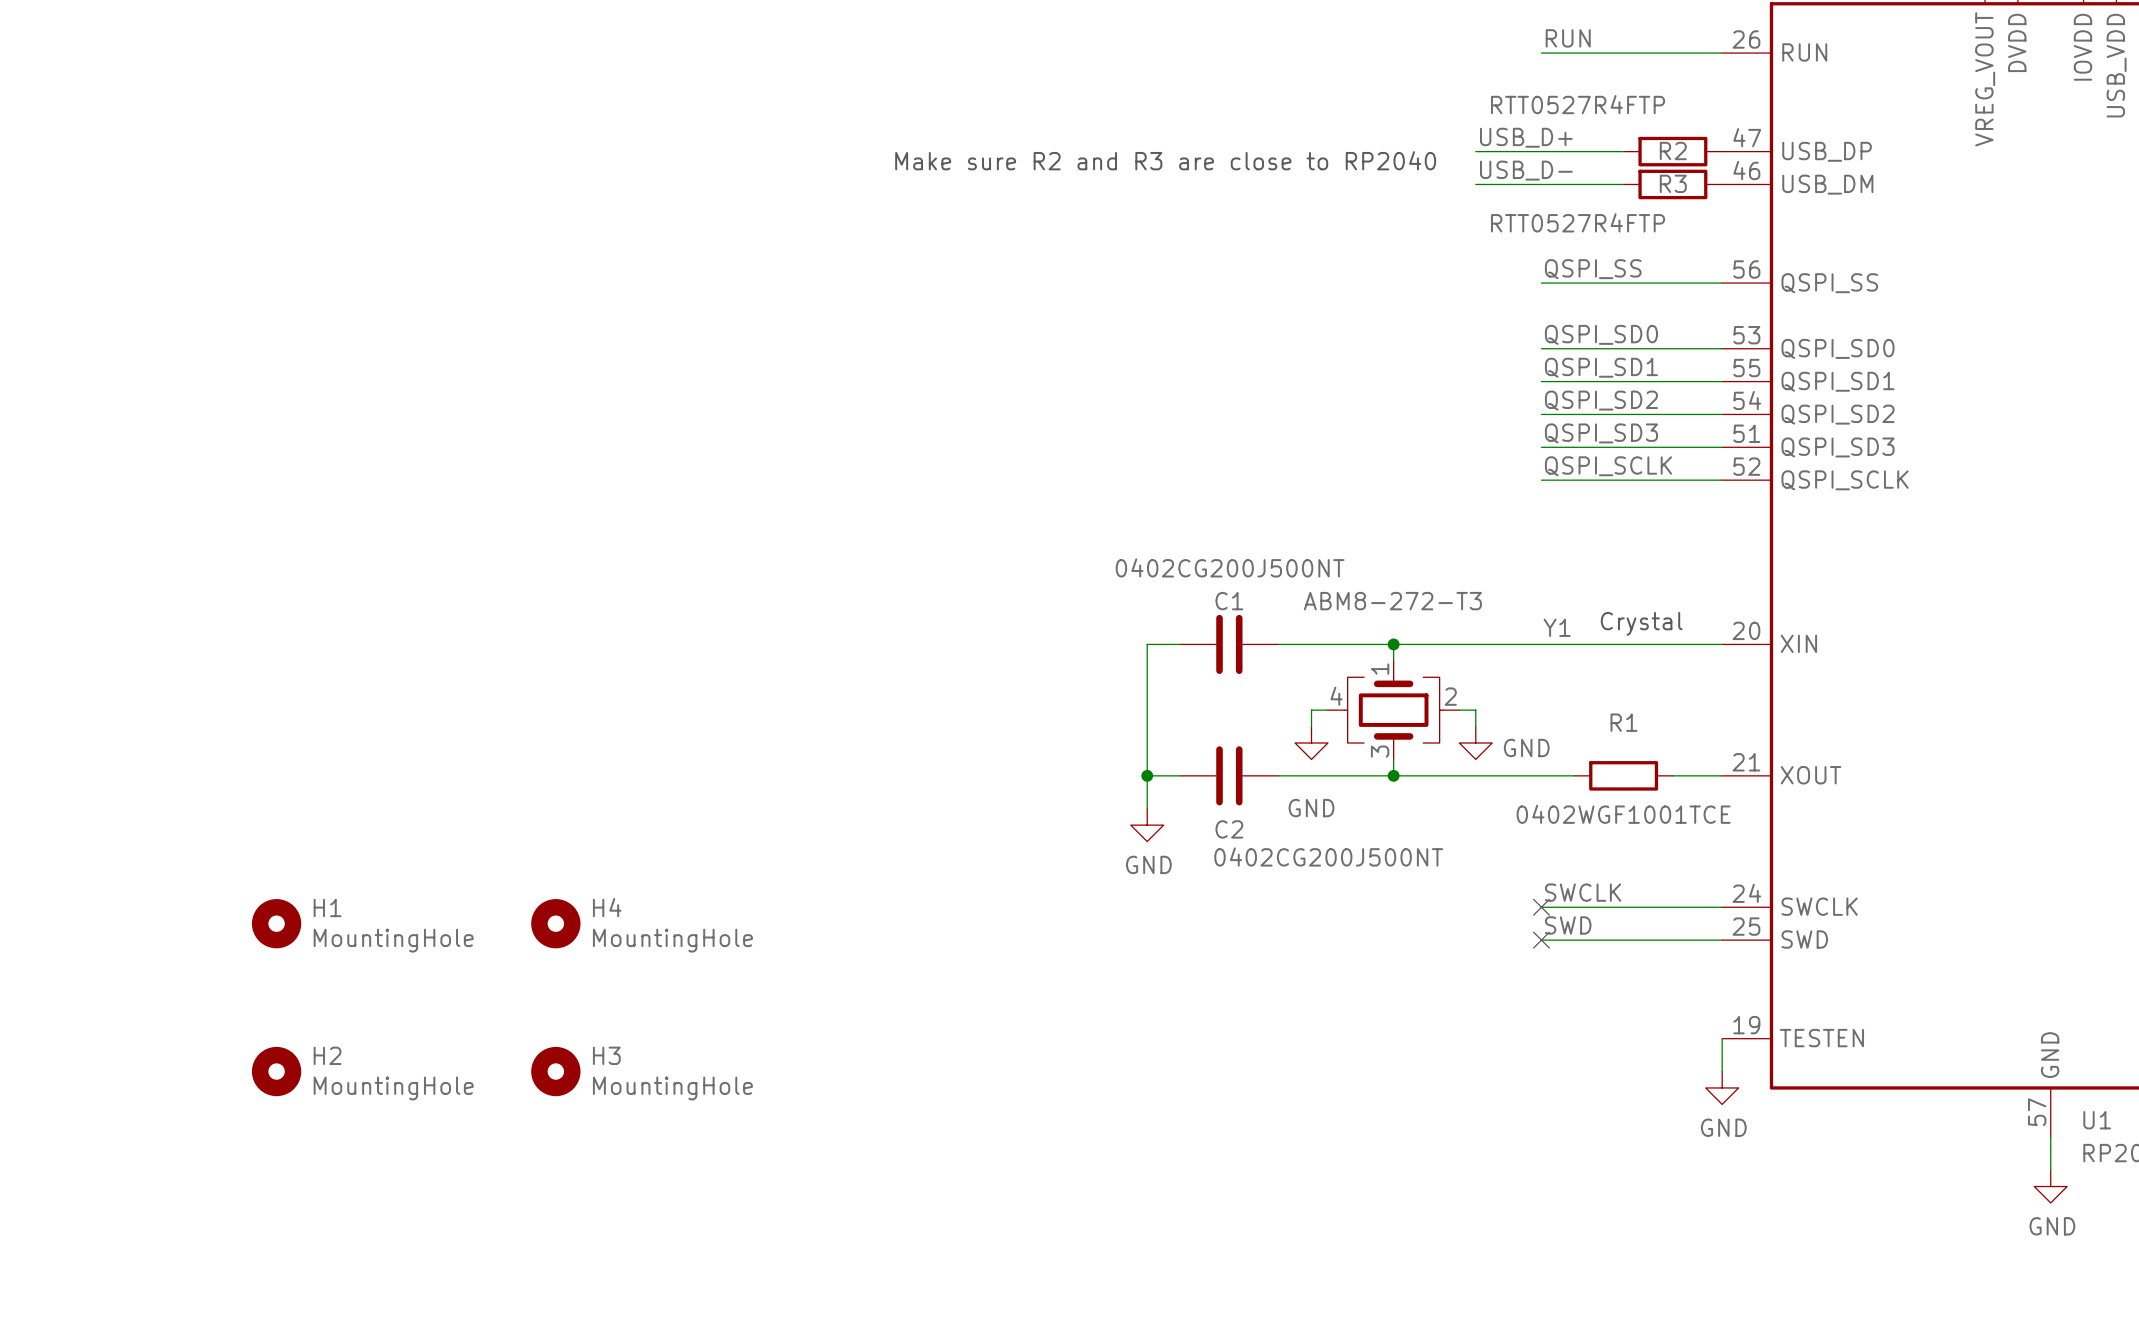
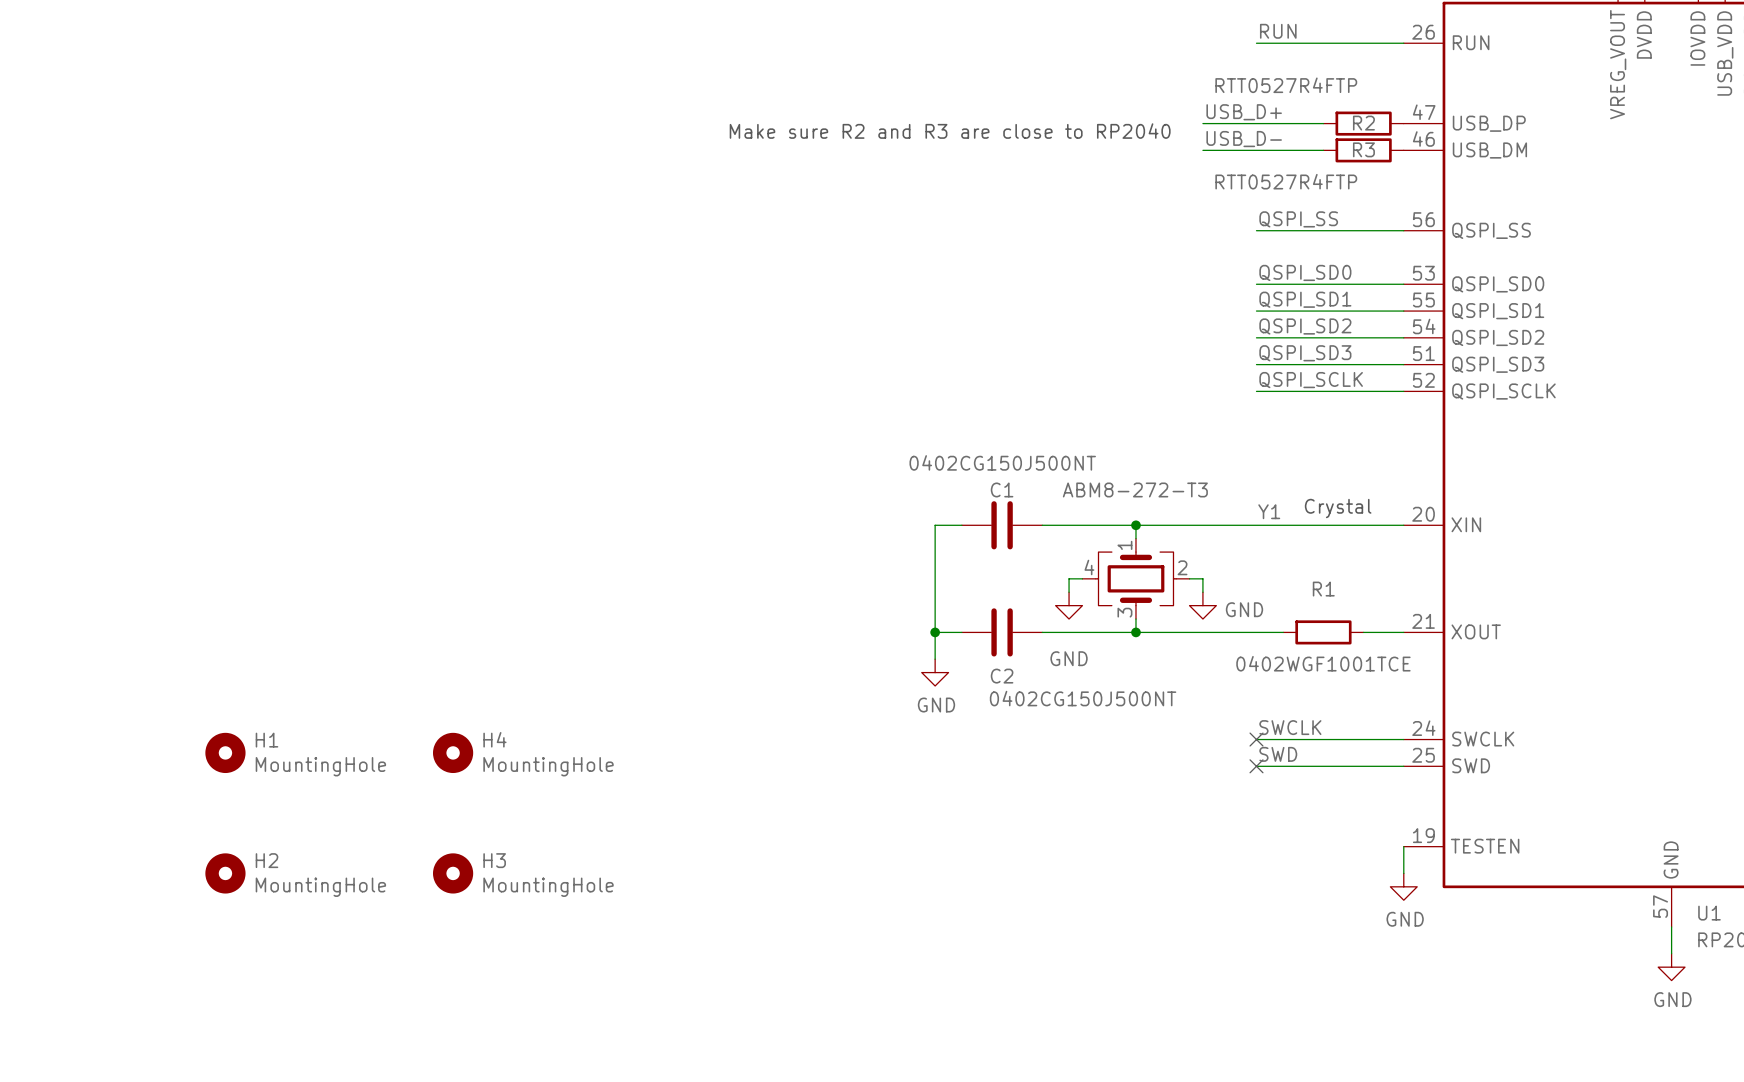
C1 value: 0402CG200J500NT (1230, 567) -> 0402CG150J500NT (1002, 462)
C2 value: 0402CG200J500NT (1328, 856) -> 0402CG150J500NT (1083, 698)

